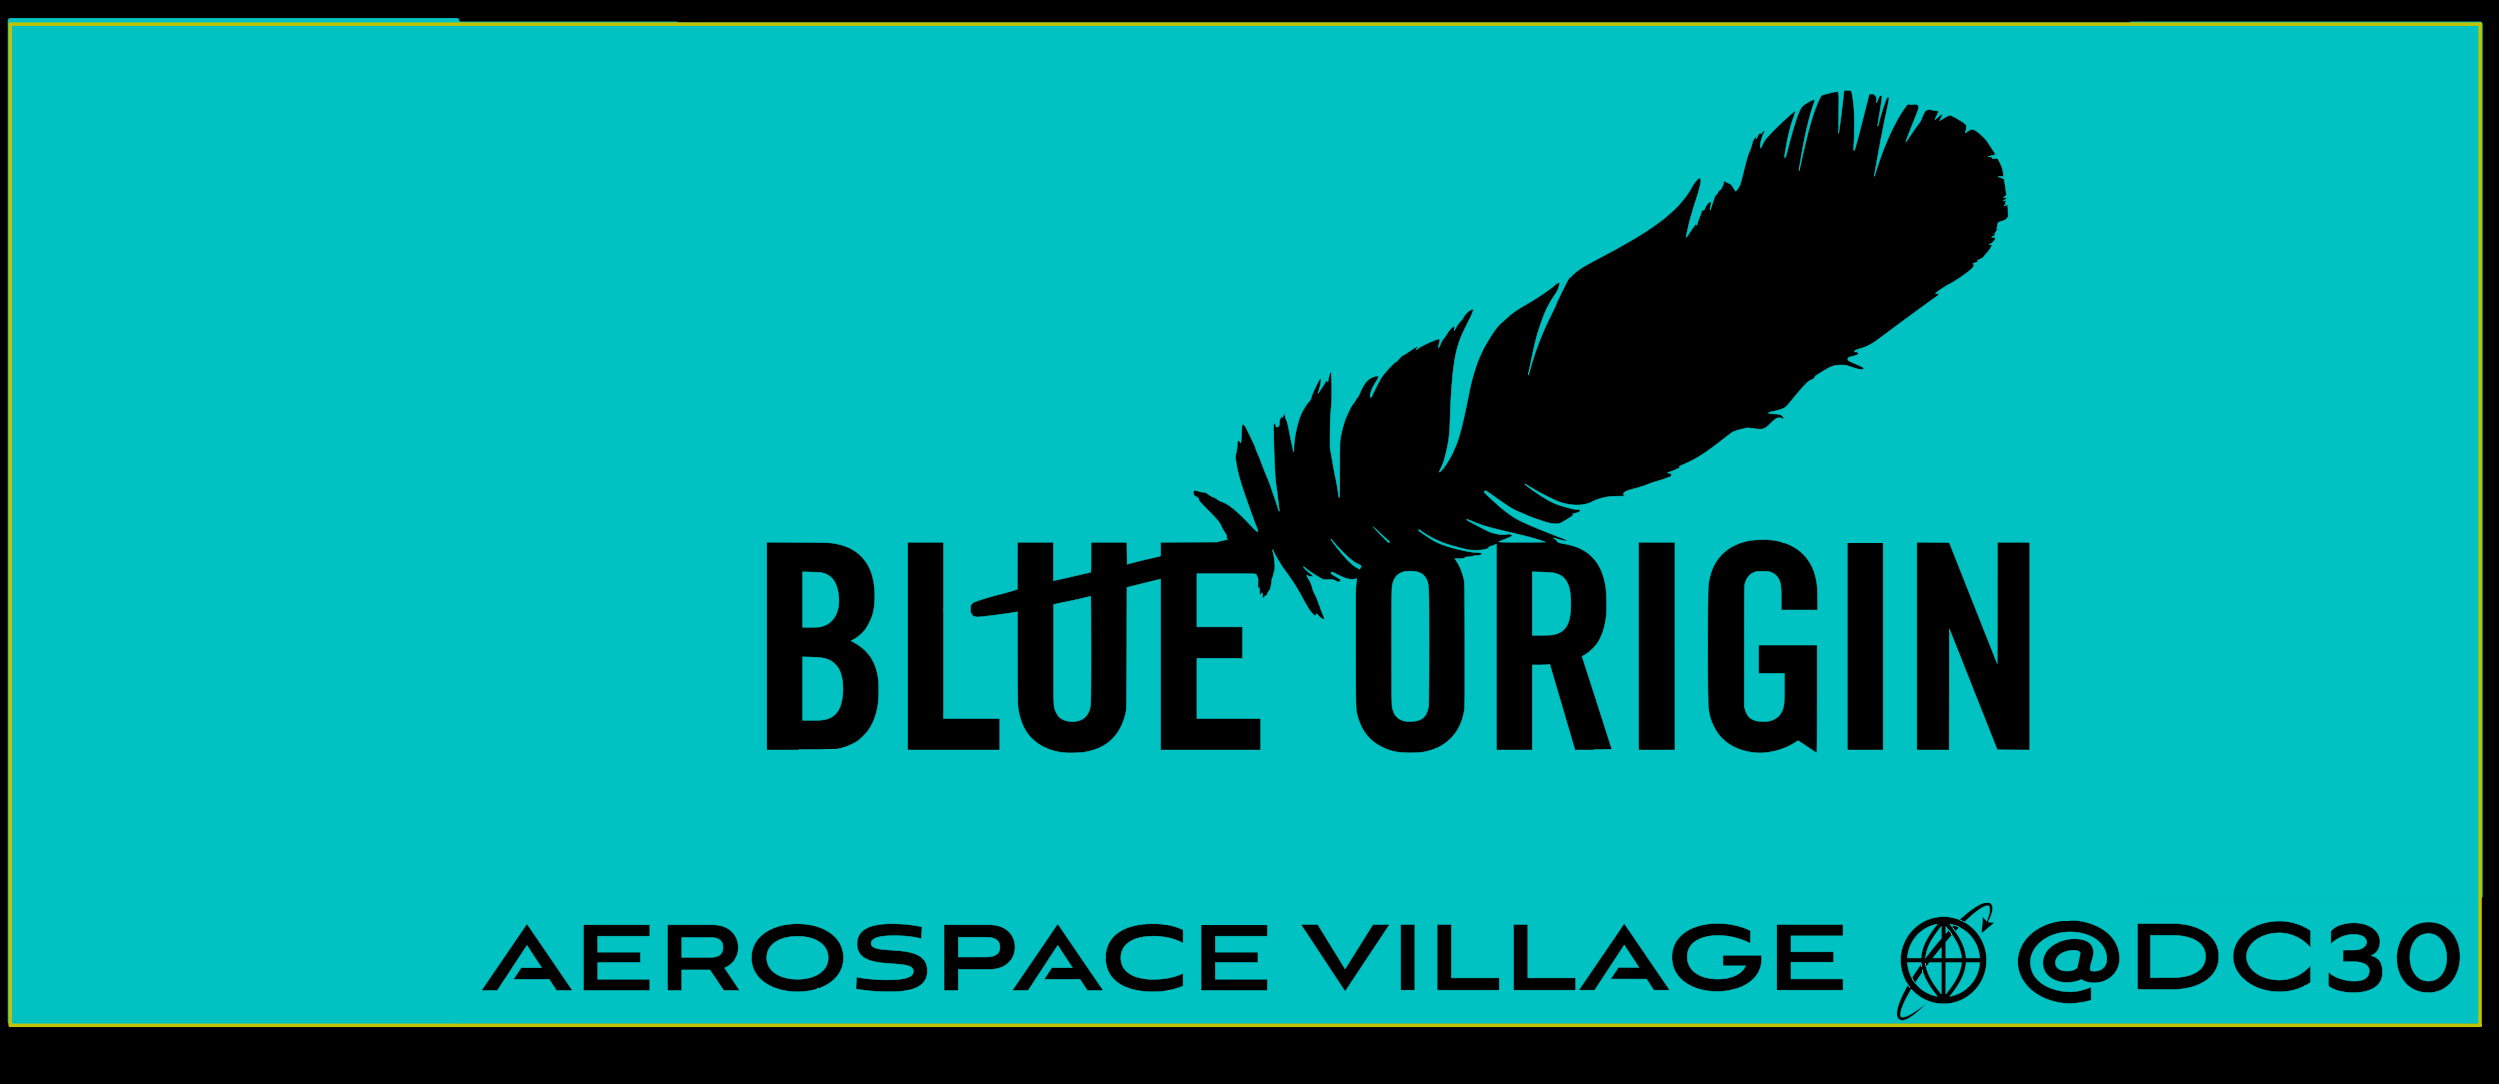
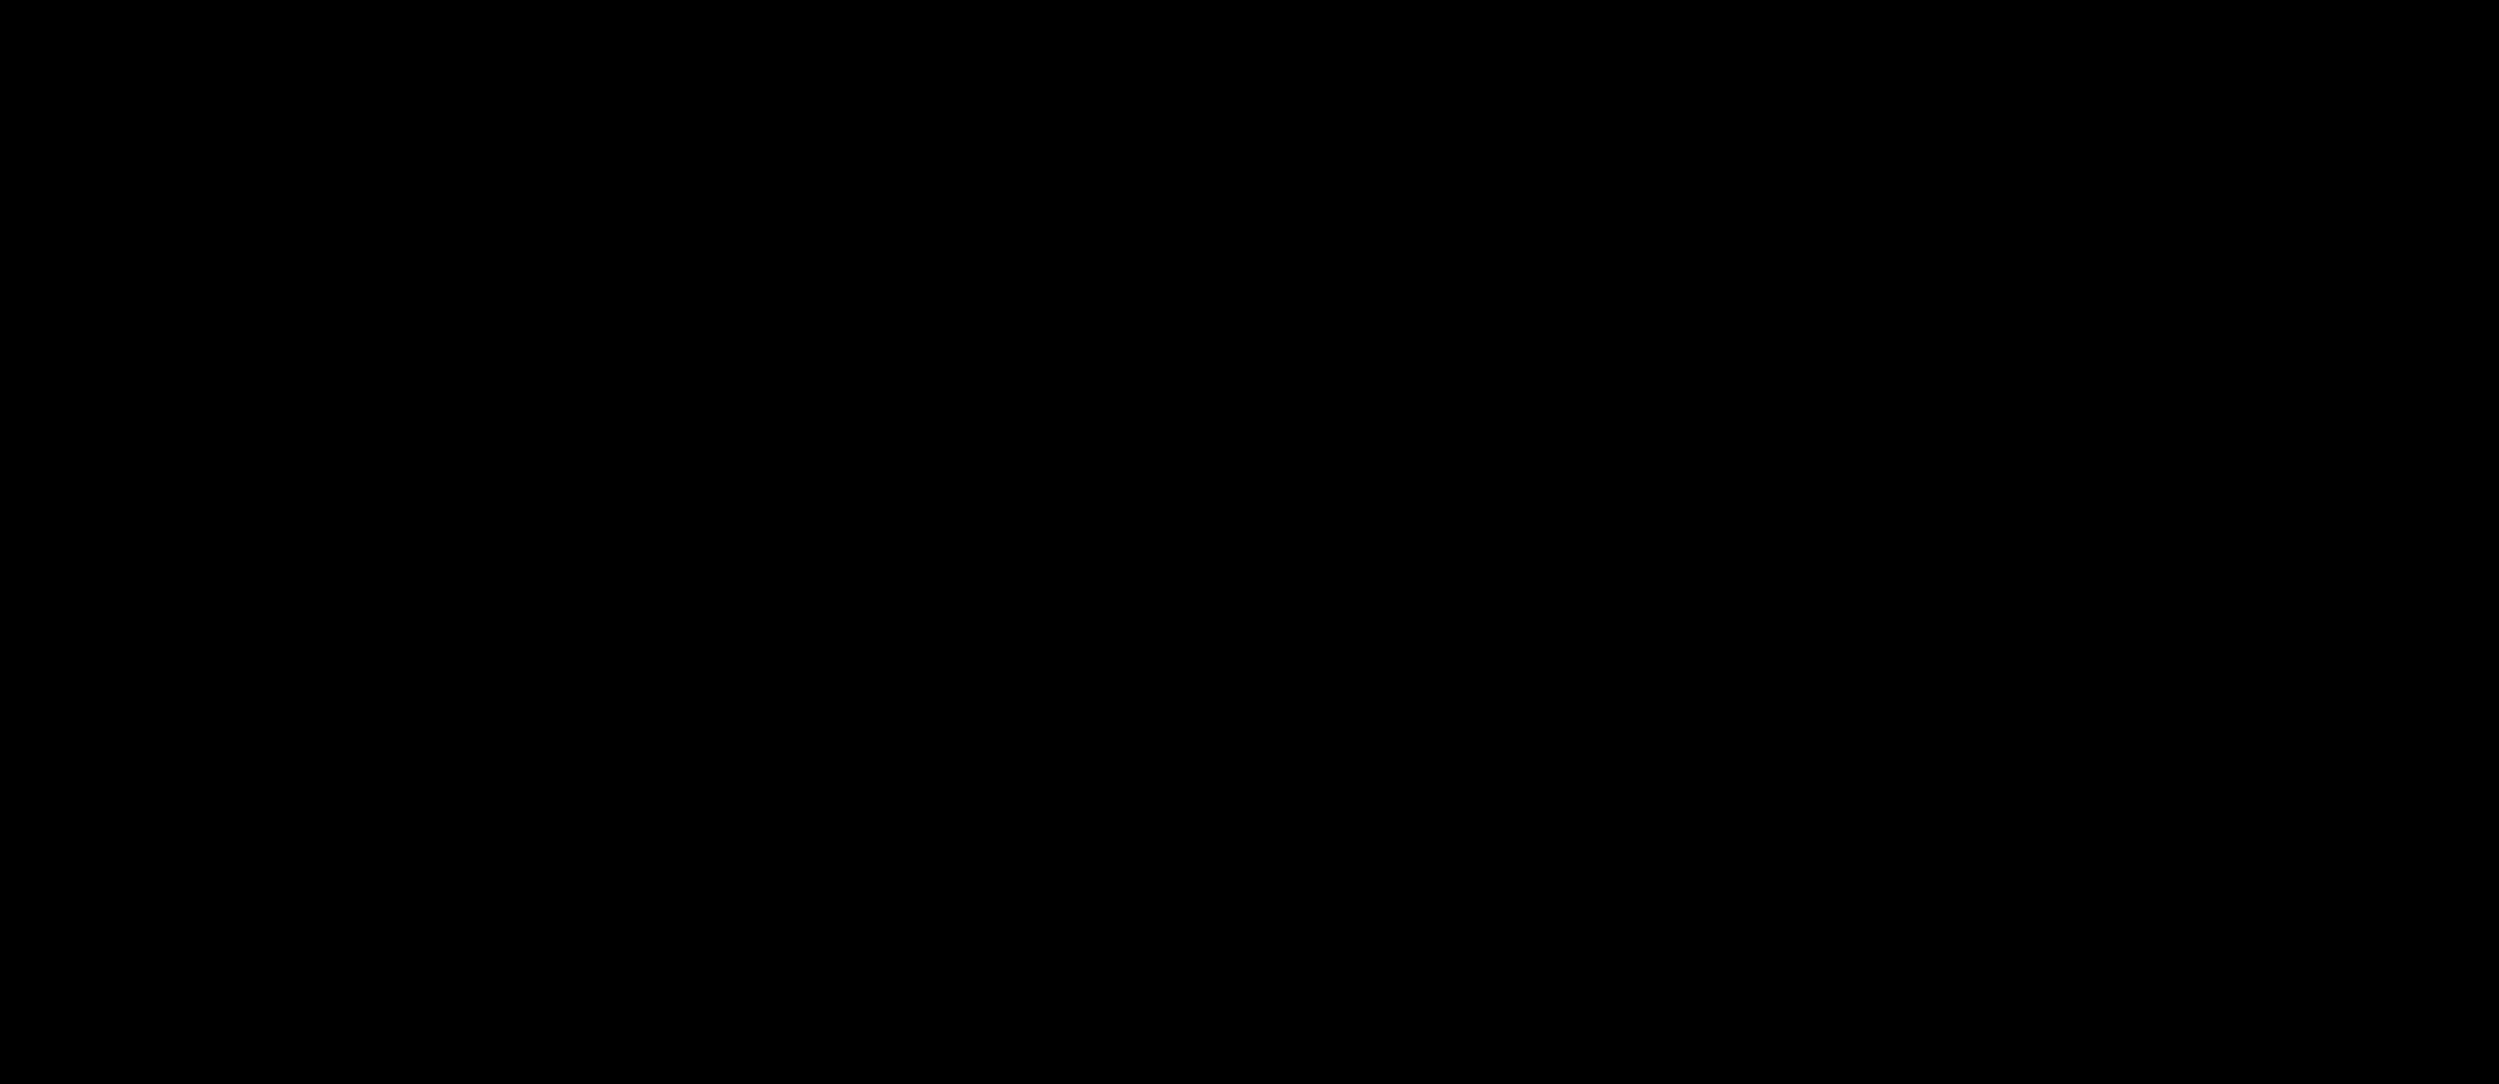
drawing: [7, 18, 2483, 1025] -> none
board edge: (10, 24) (2480, 24) (2480, 1025) (10, 1025) (10, 24) -> none

